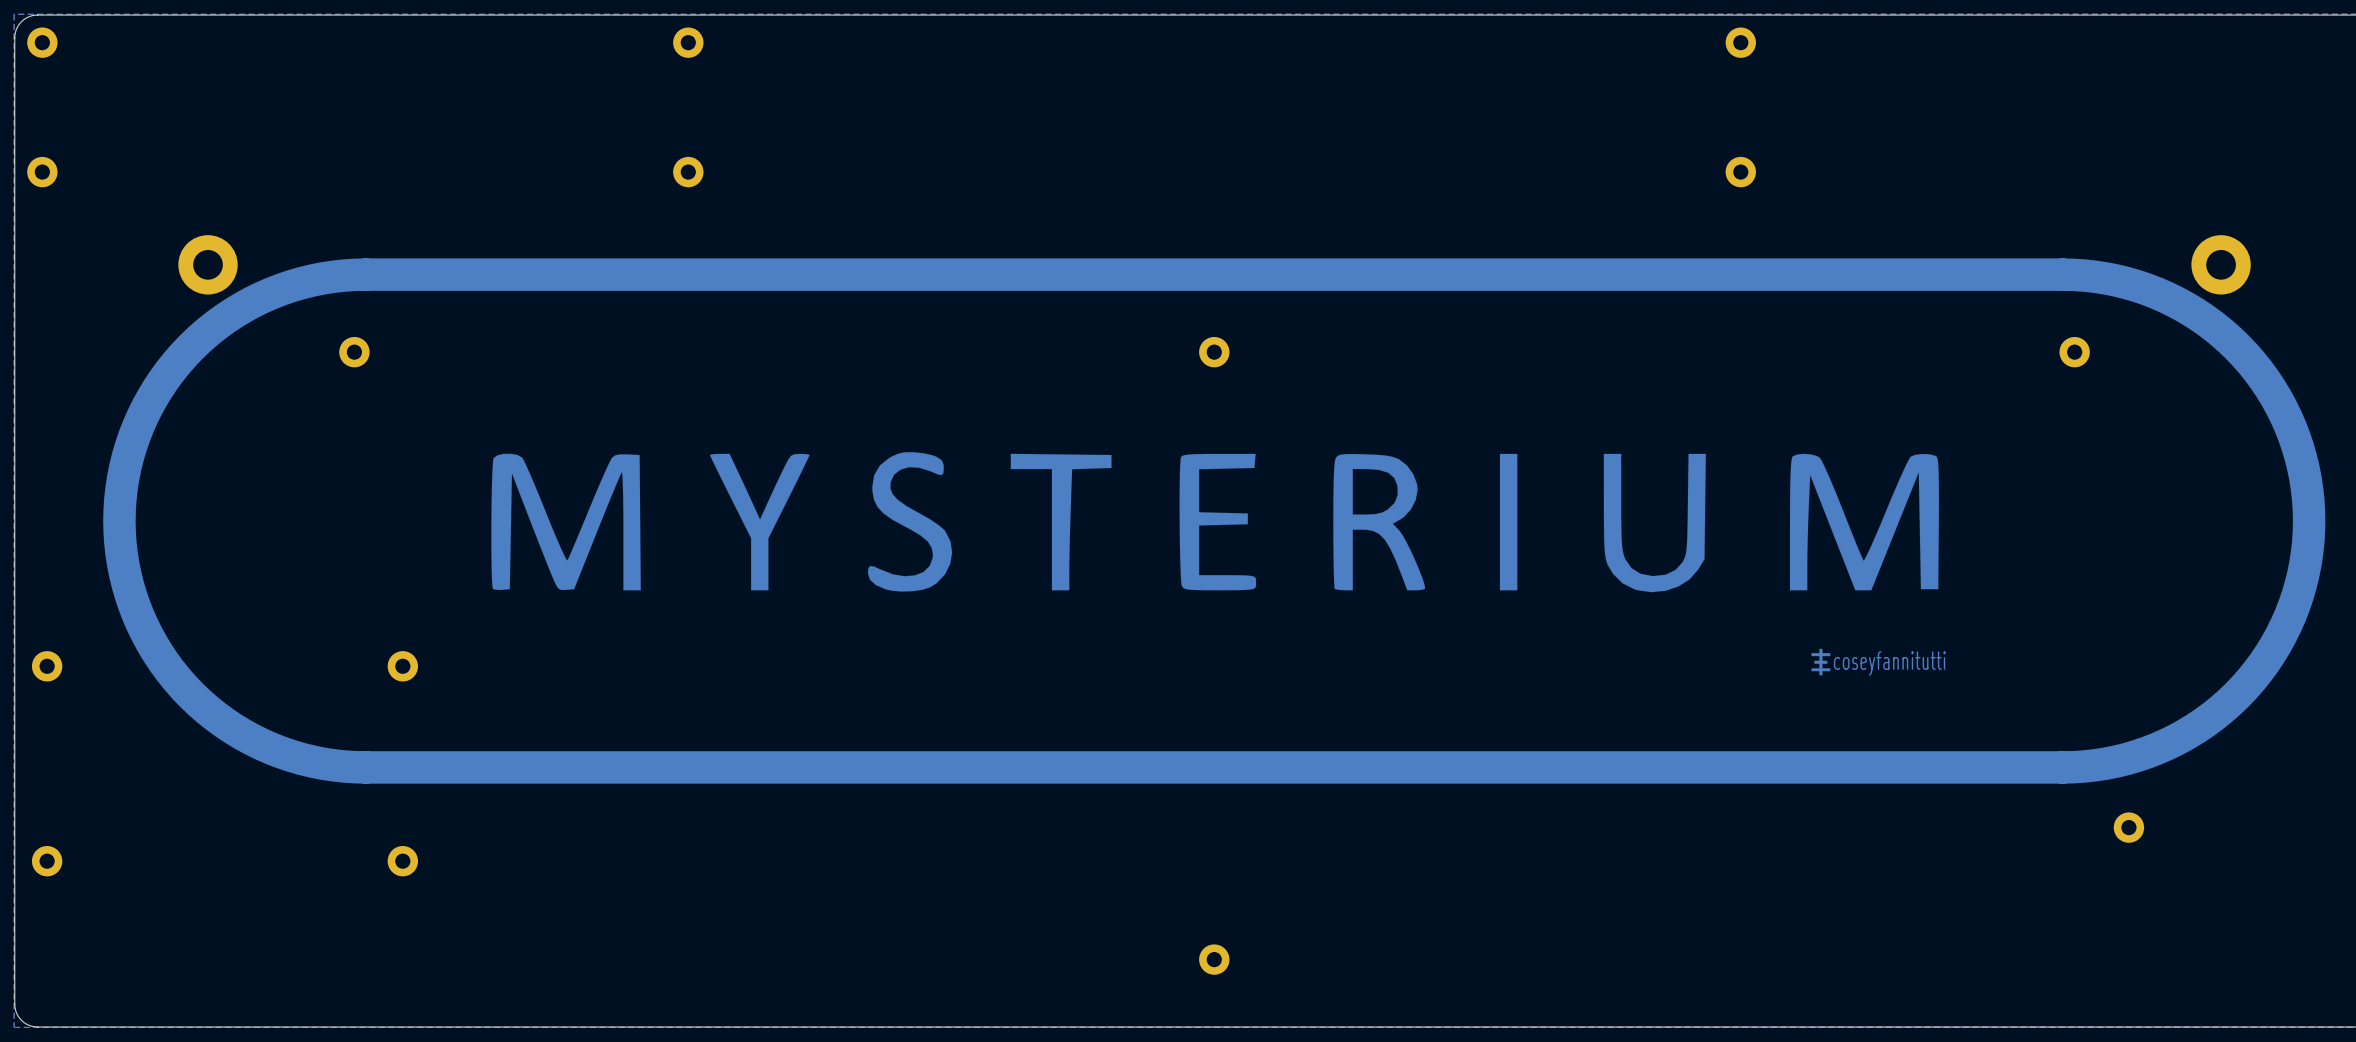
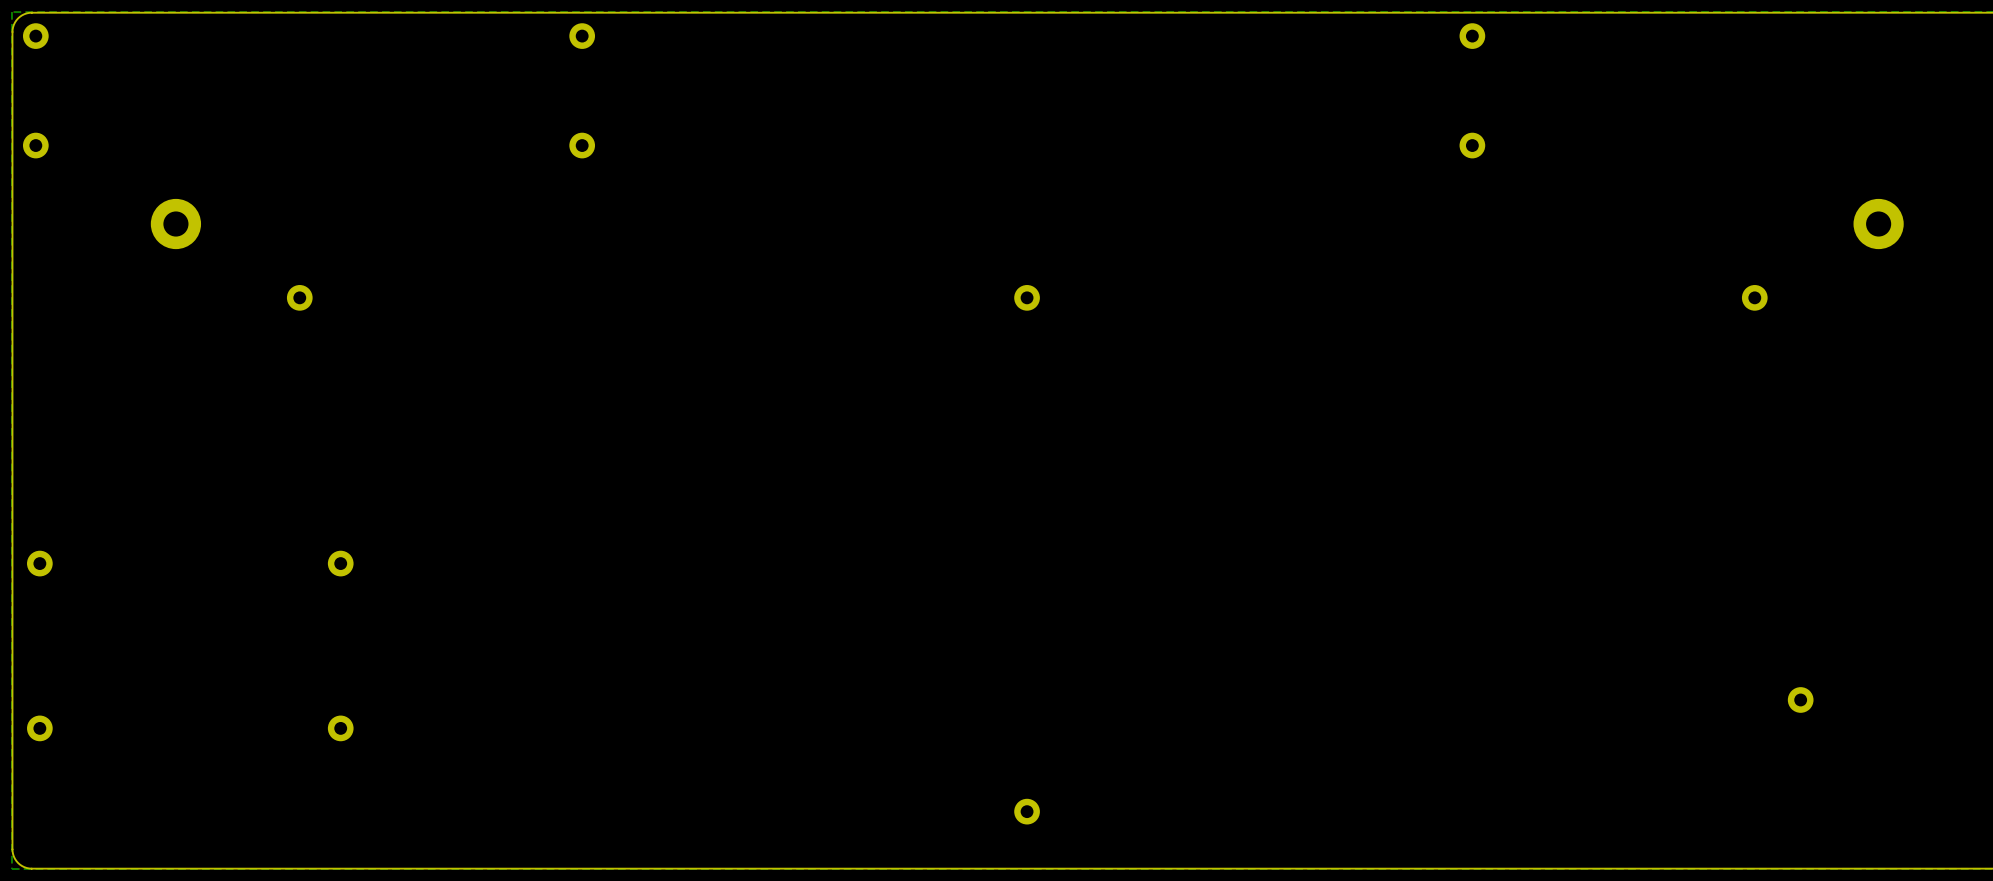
drawing: [103, 258, 2326, 784] -> none
text: coseyfannitutti (1889, 663) -> none

